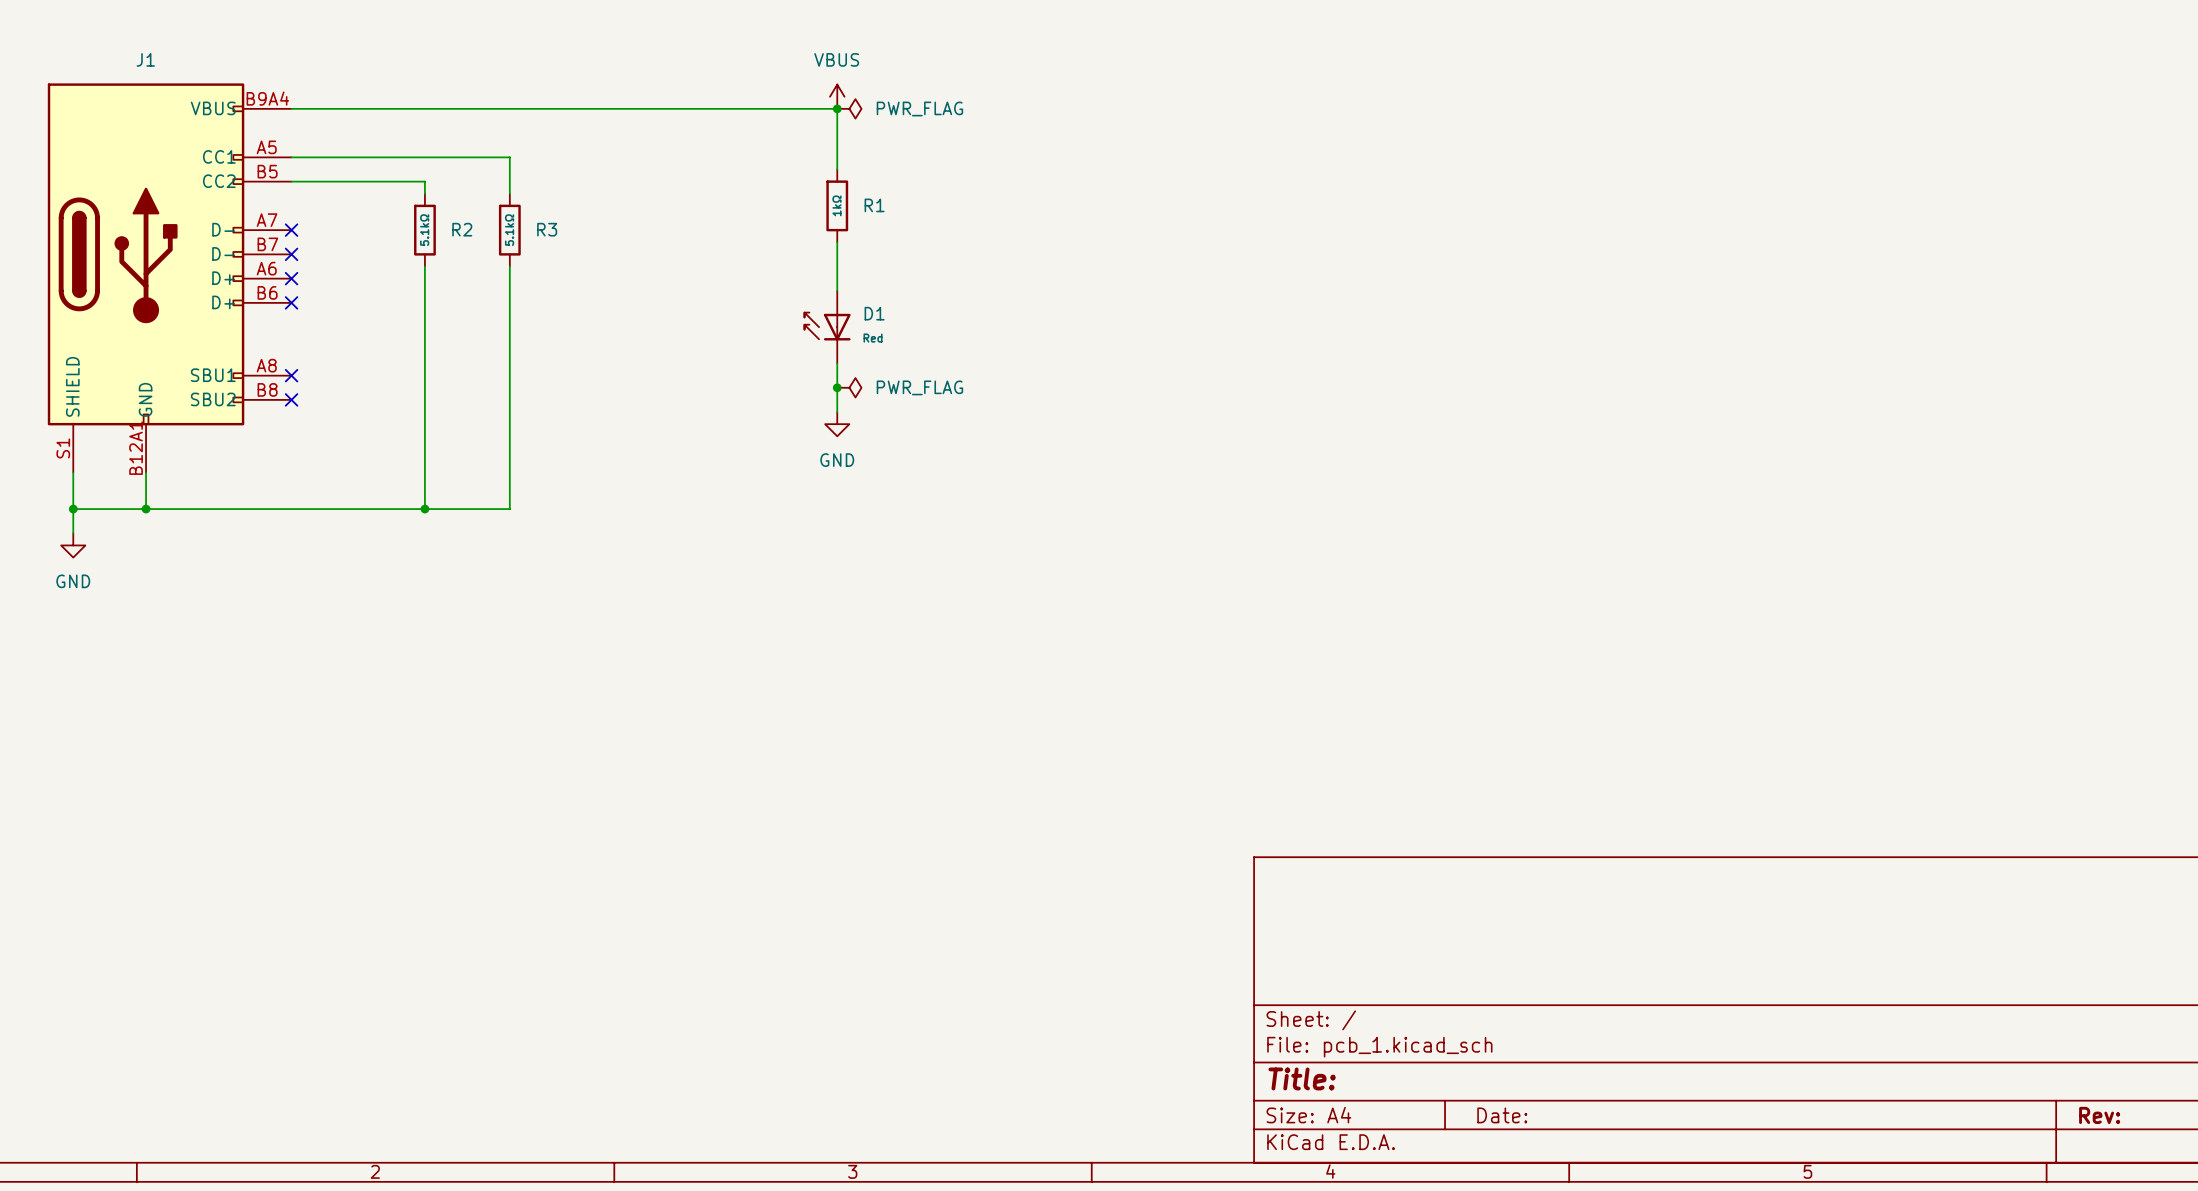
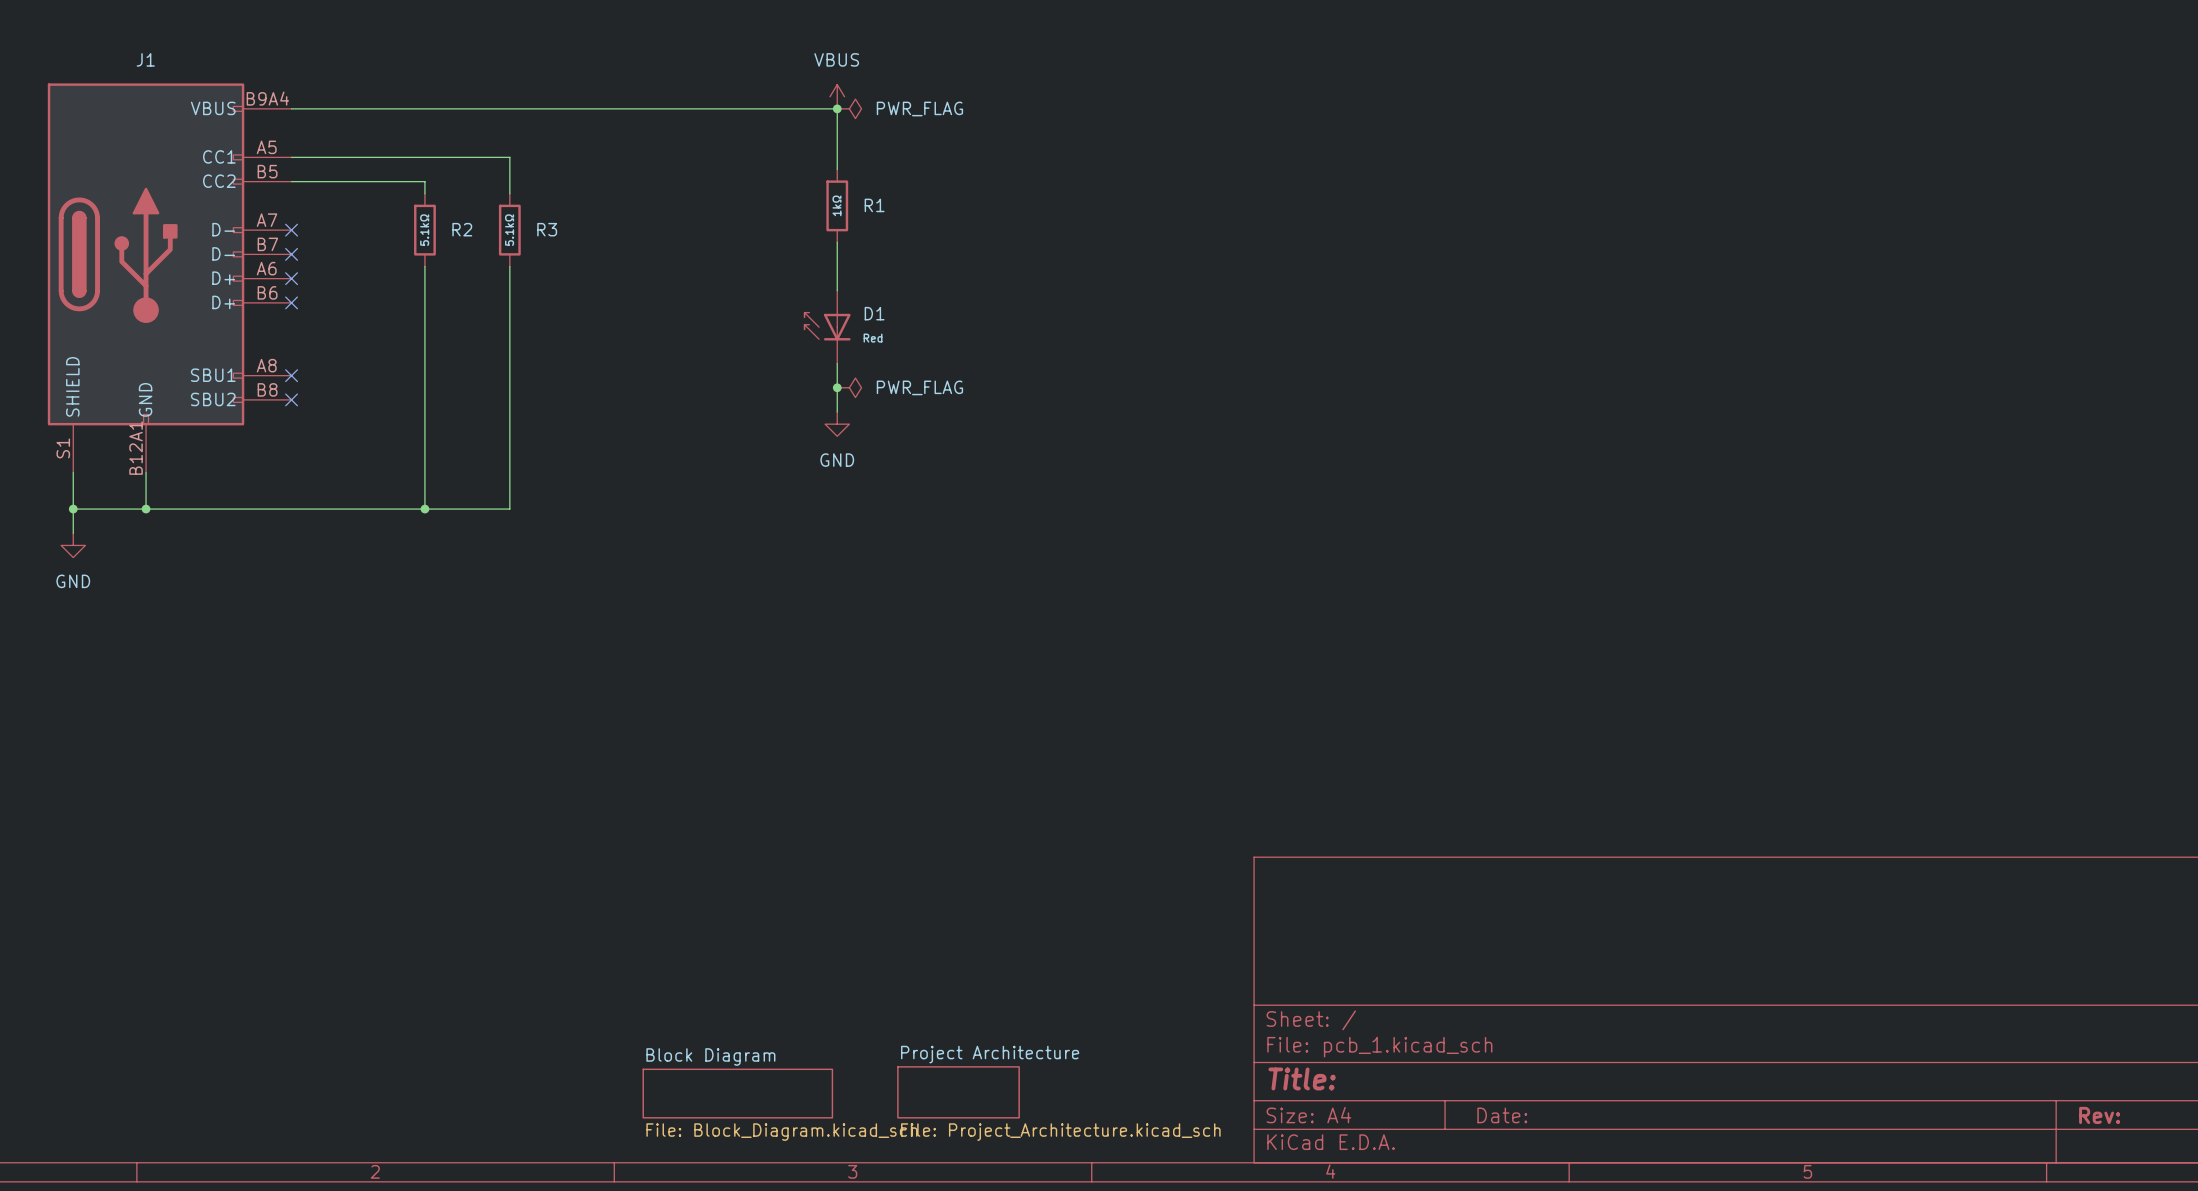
sheet Project Architecture: none -> File: Project_Architecture.kicad_sch (958, 1092)
sheet Block Diagram: none -> File: Block_Diagram.kicad_sch (737, 1093)

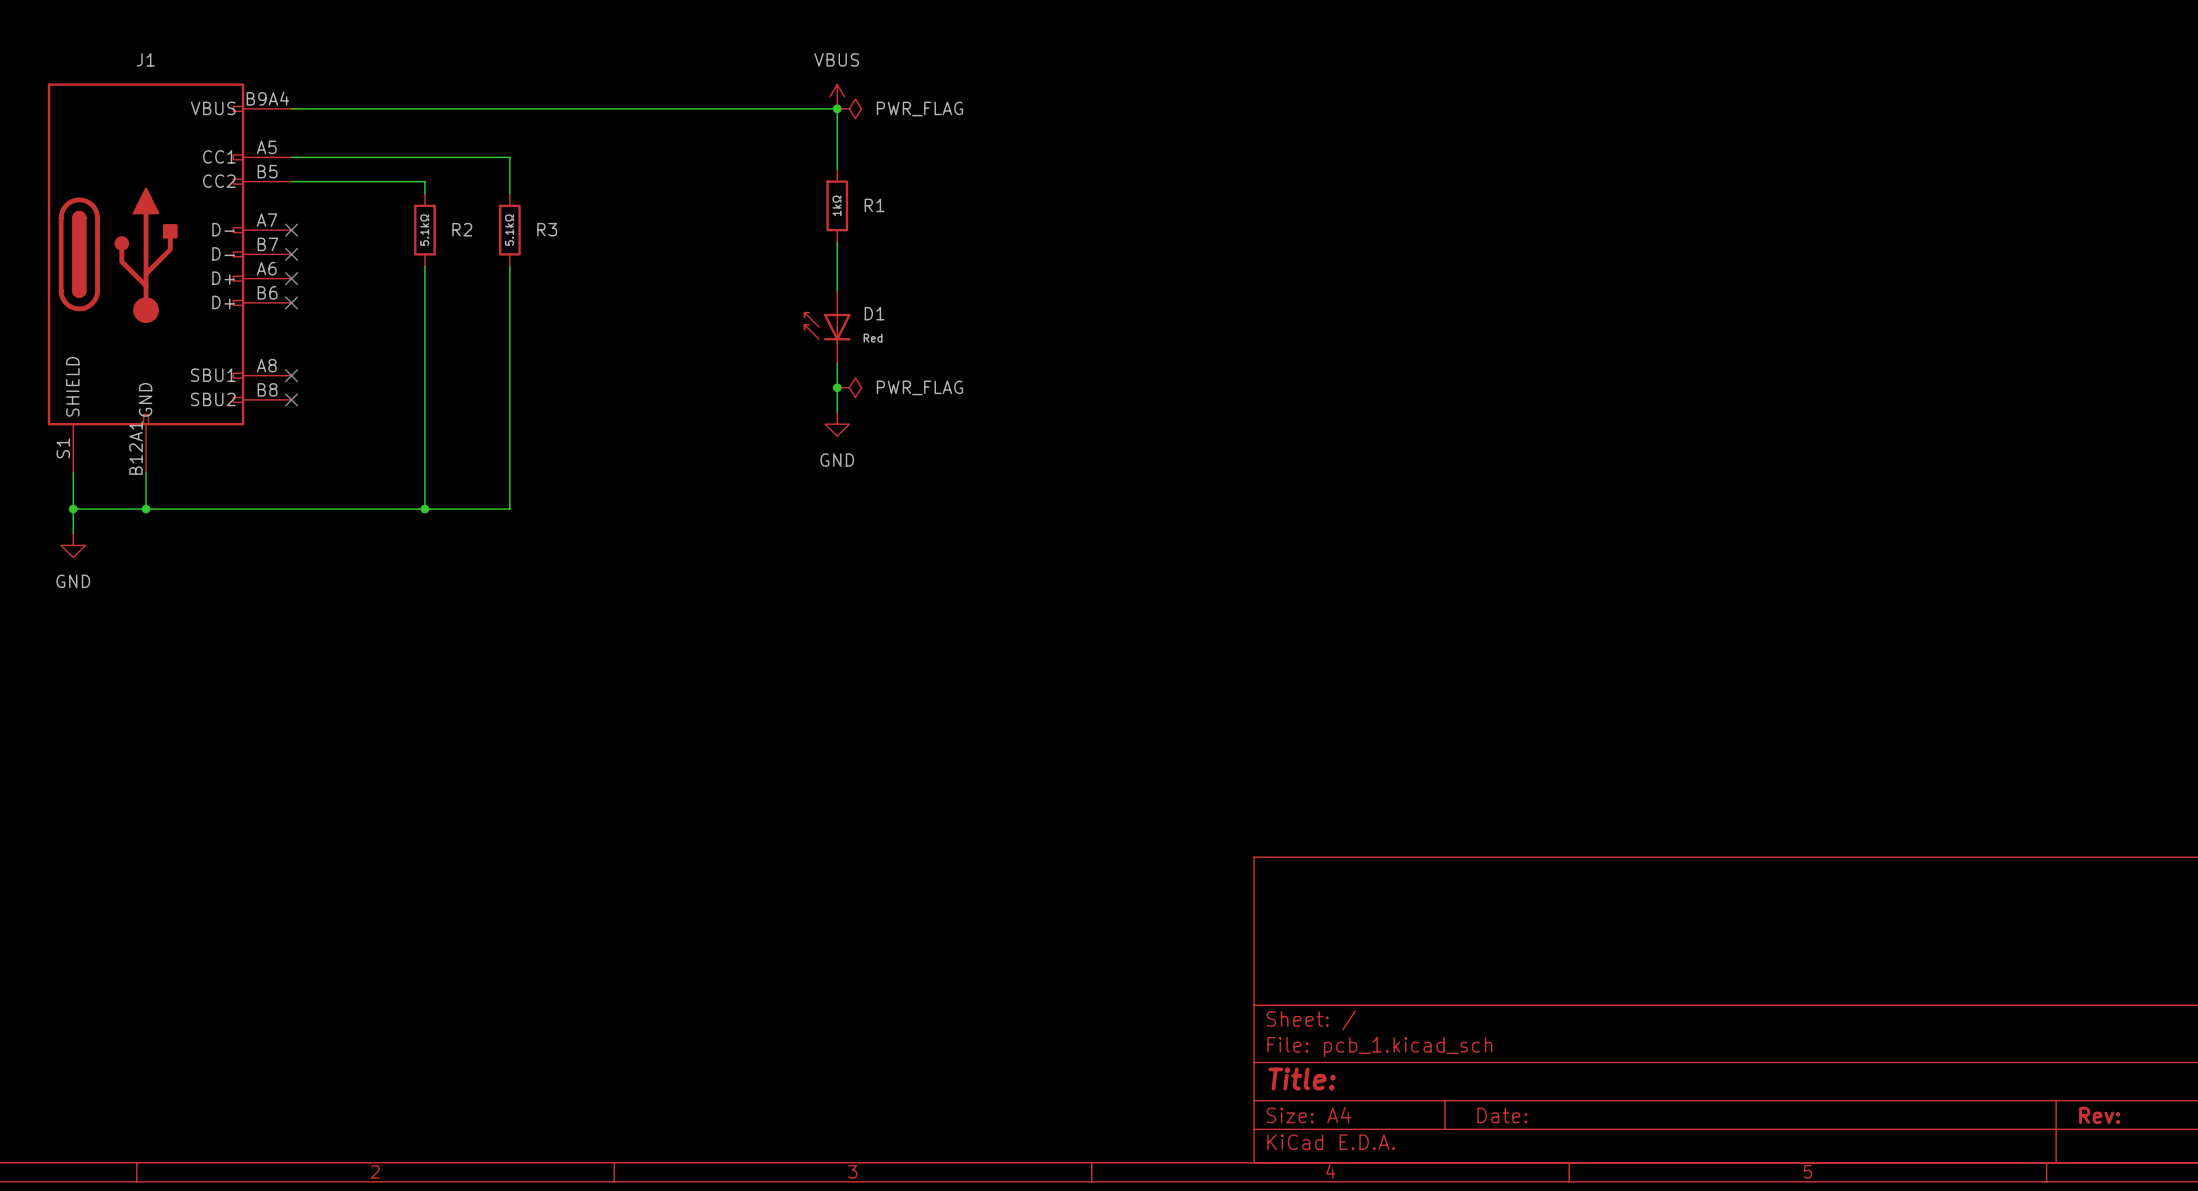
sheet Project Architecture: File: Project_Architecture.kicad_sch (958, 1092) -> none
sheet Block Diagram: File: Block_Diagram.kicad_sch (737, 1093) -> none

